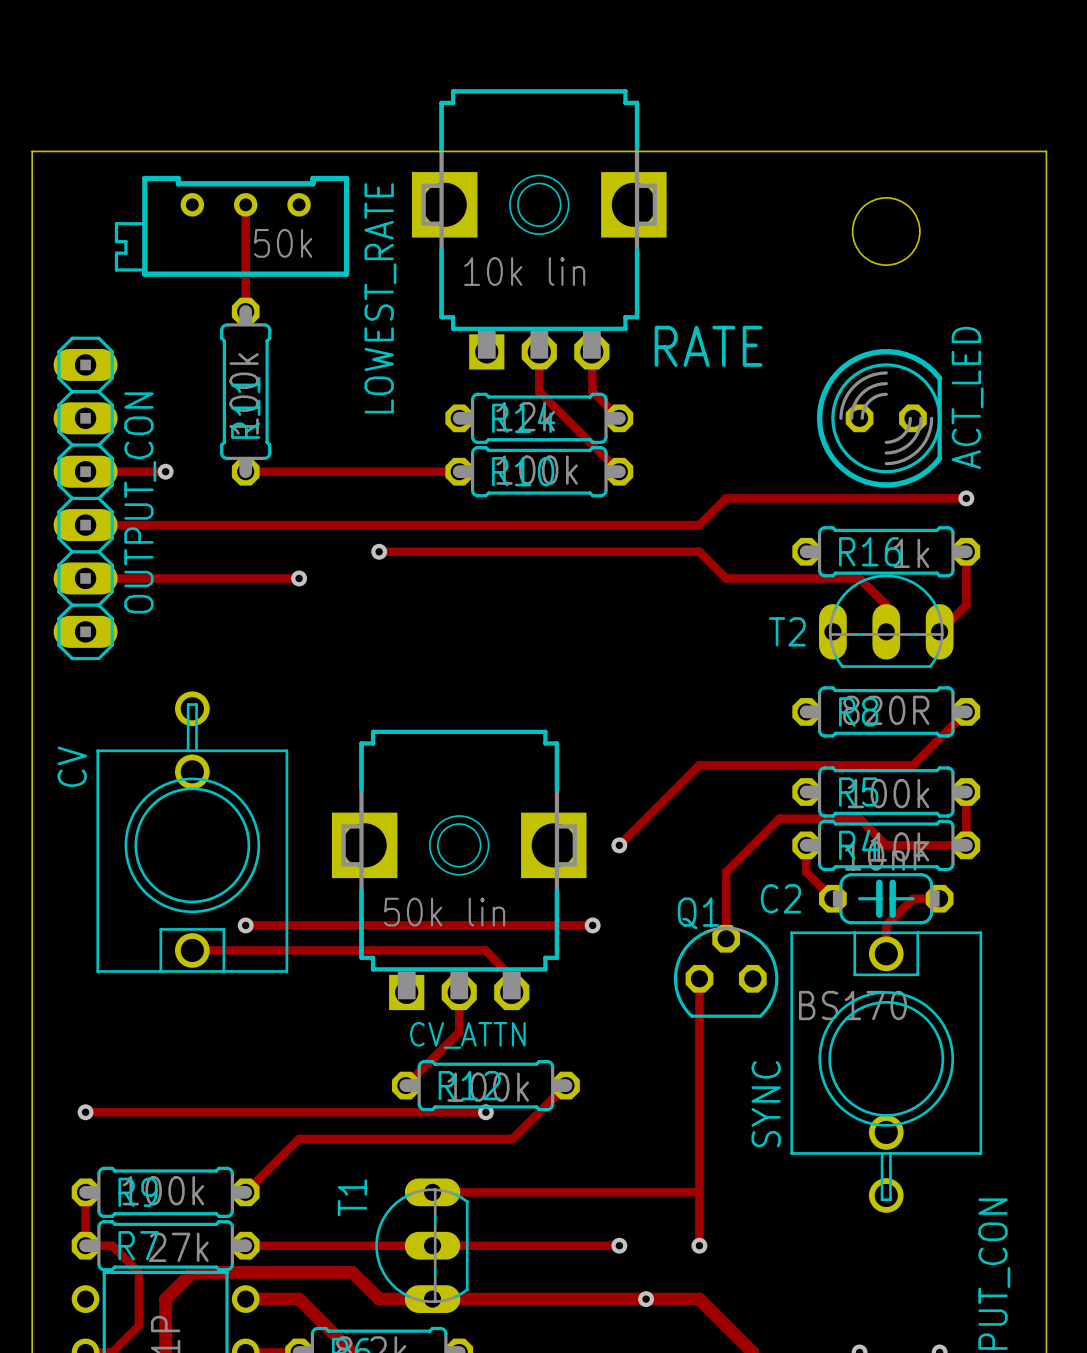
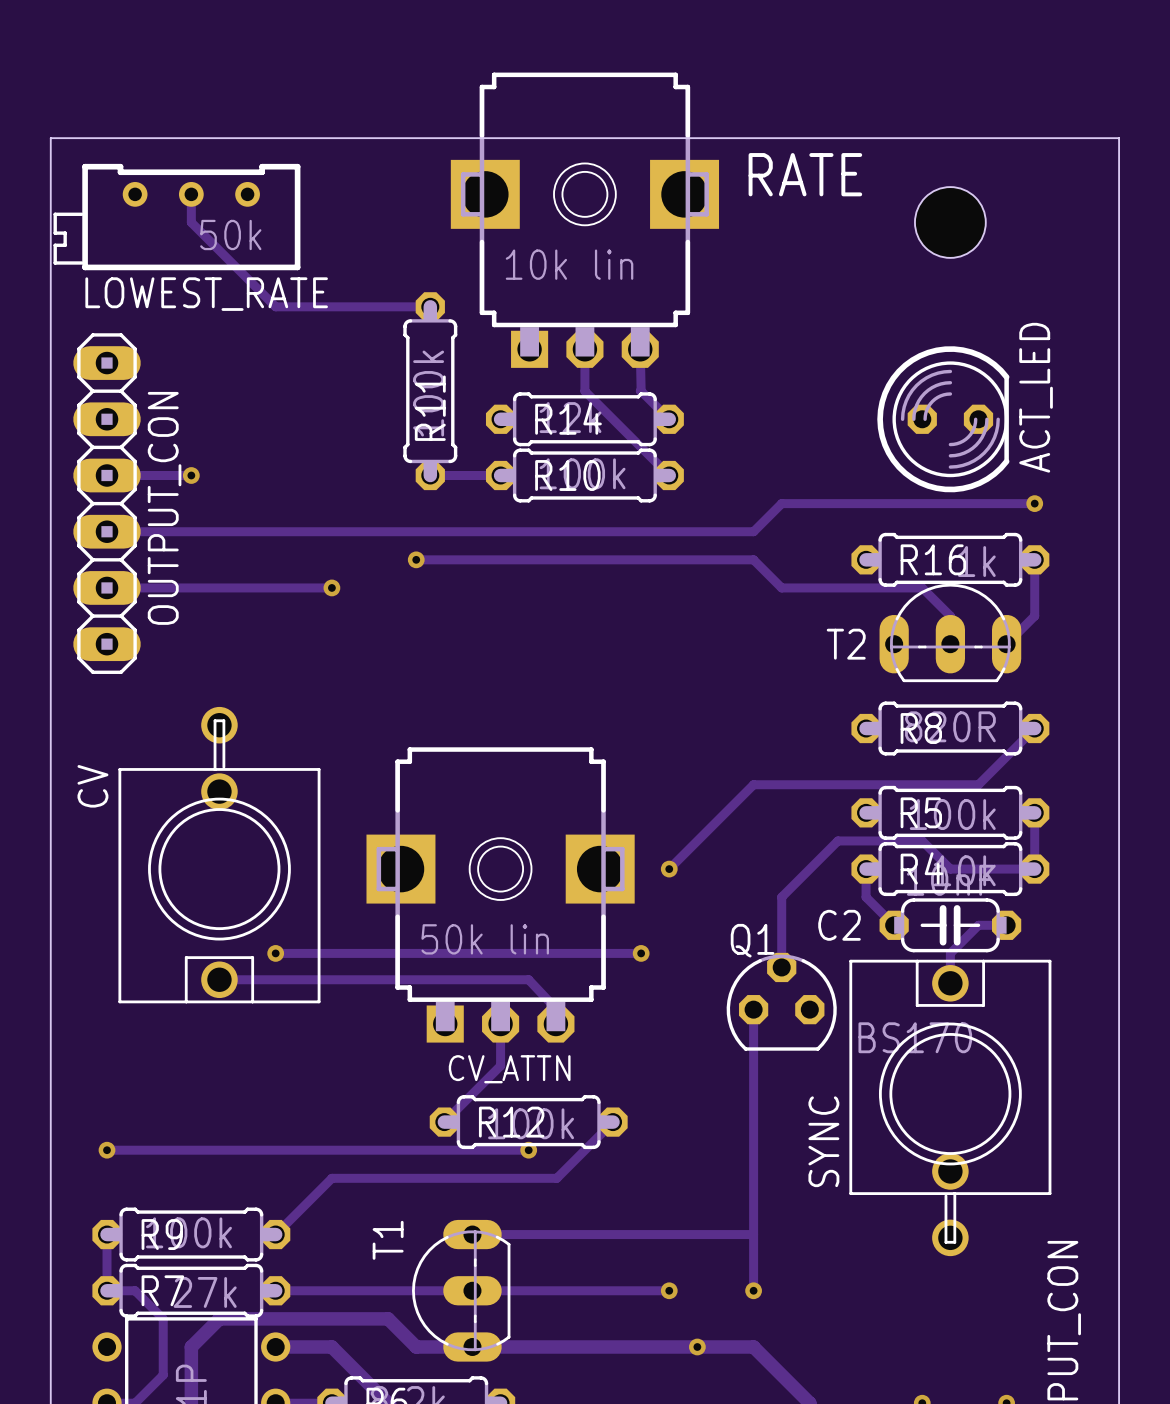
track: none -> (191, 194) (191, 222) (275, 306) (430, 306)
track: (245, 204) (245, 311) -> none
LOWEST_RATE position: (232, 226) -> (176, 217)
LOWEST_RATE name rotation: 0° (380, 298) -> 90° clockwise (206, 294)
RATE name position: RATE (708, 346) -> RATE (805, 174)
R11 position: (245, 391) -> (430, 391)
track: (245, 471) (392, 471) -> none

